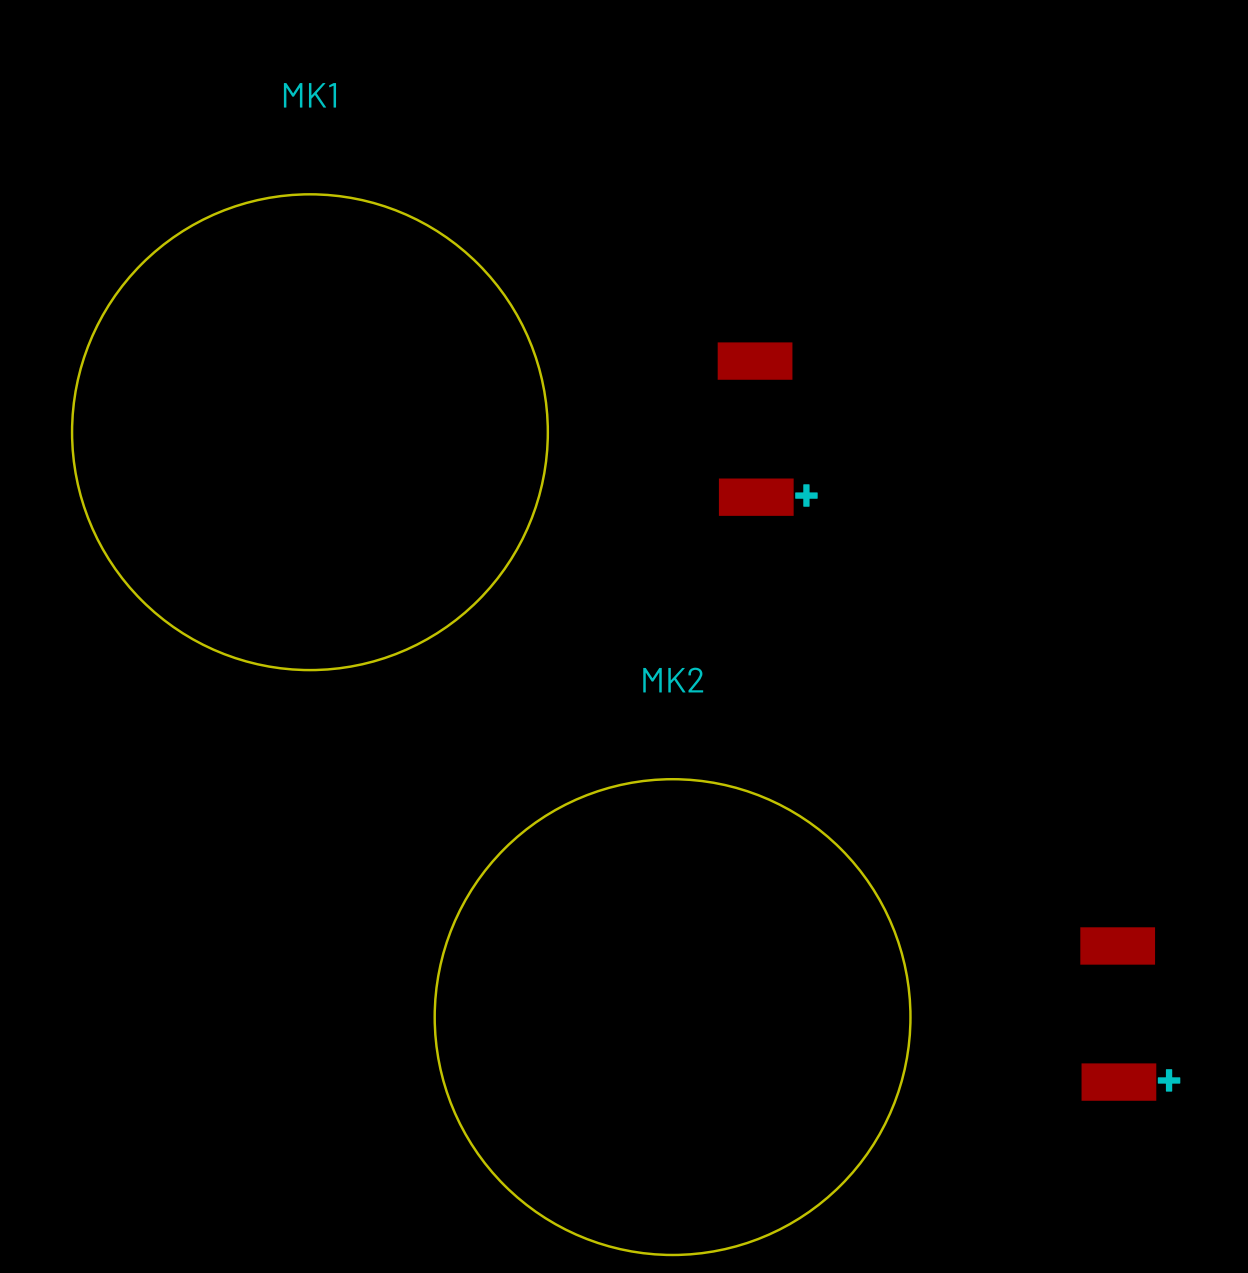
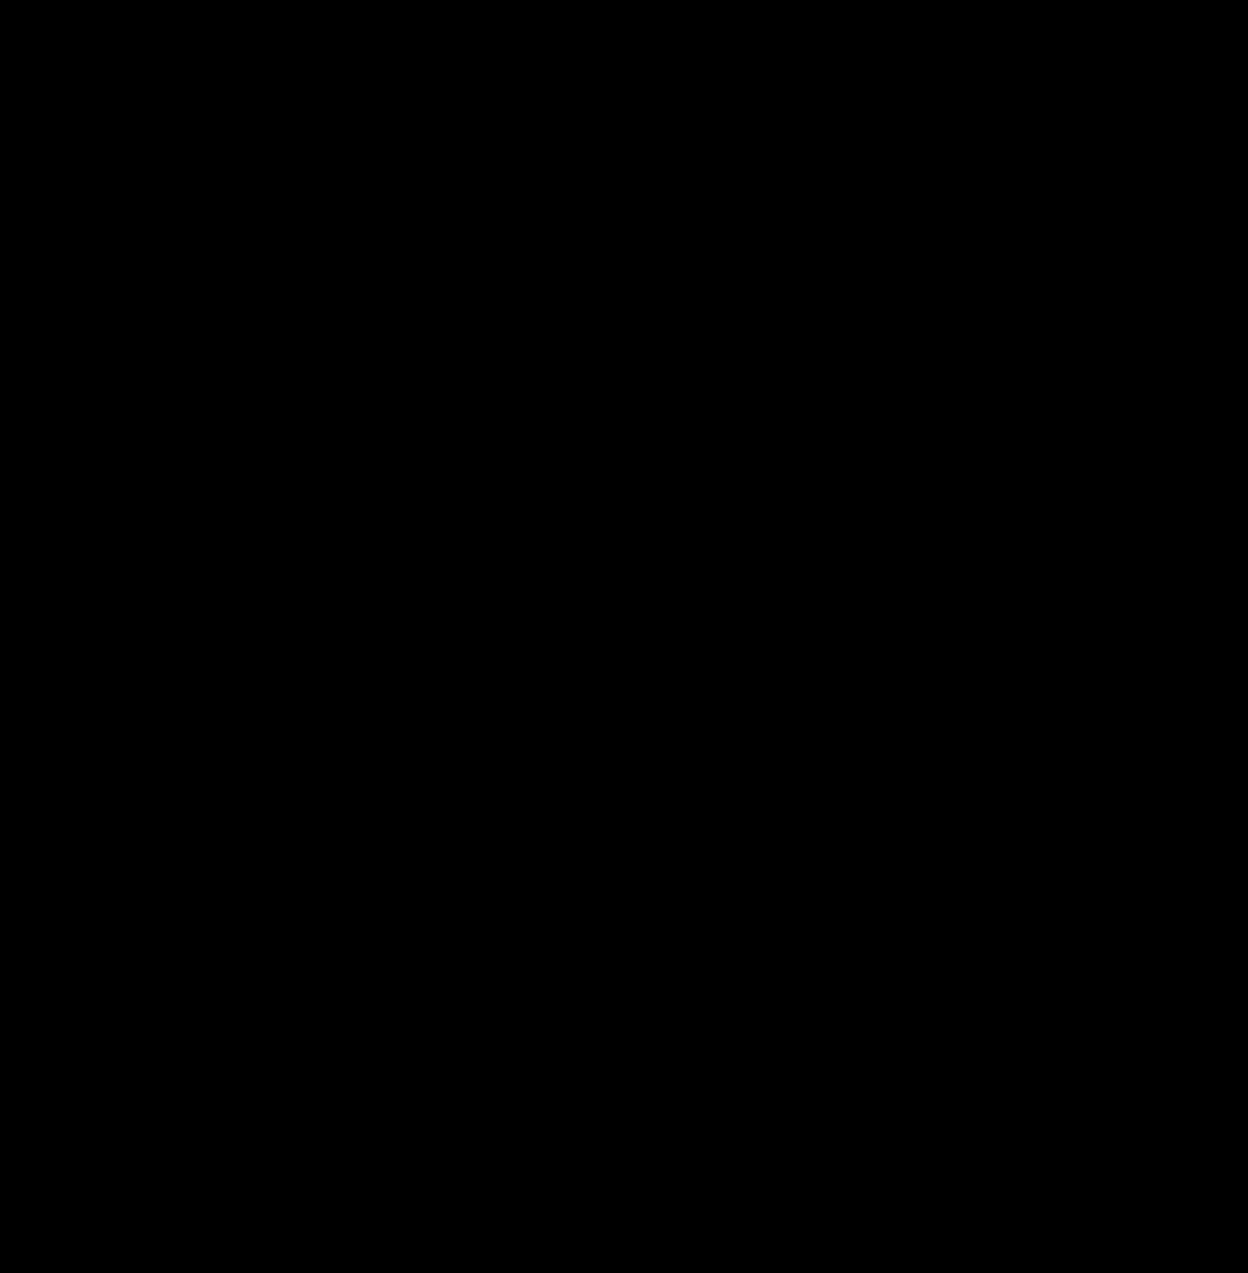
MK1: (432, 432) -> none
MK2: (794, 1017) -> none

